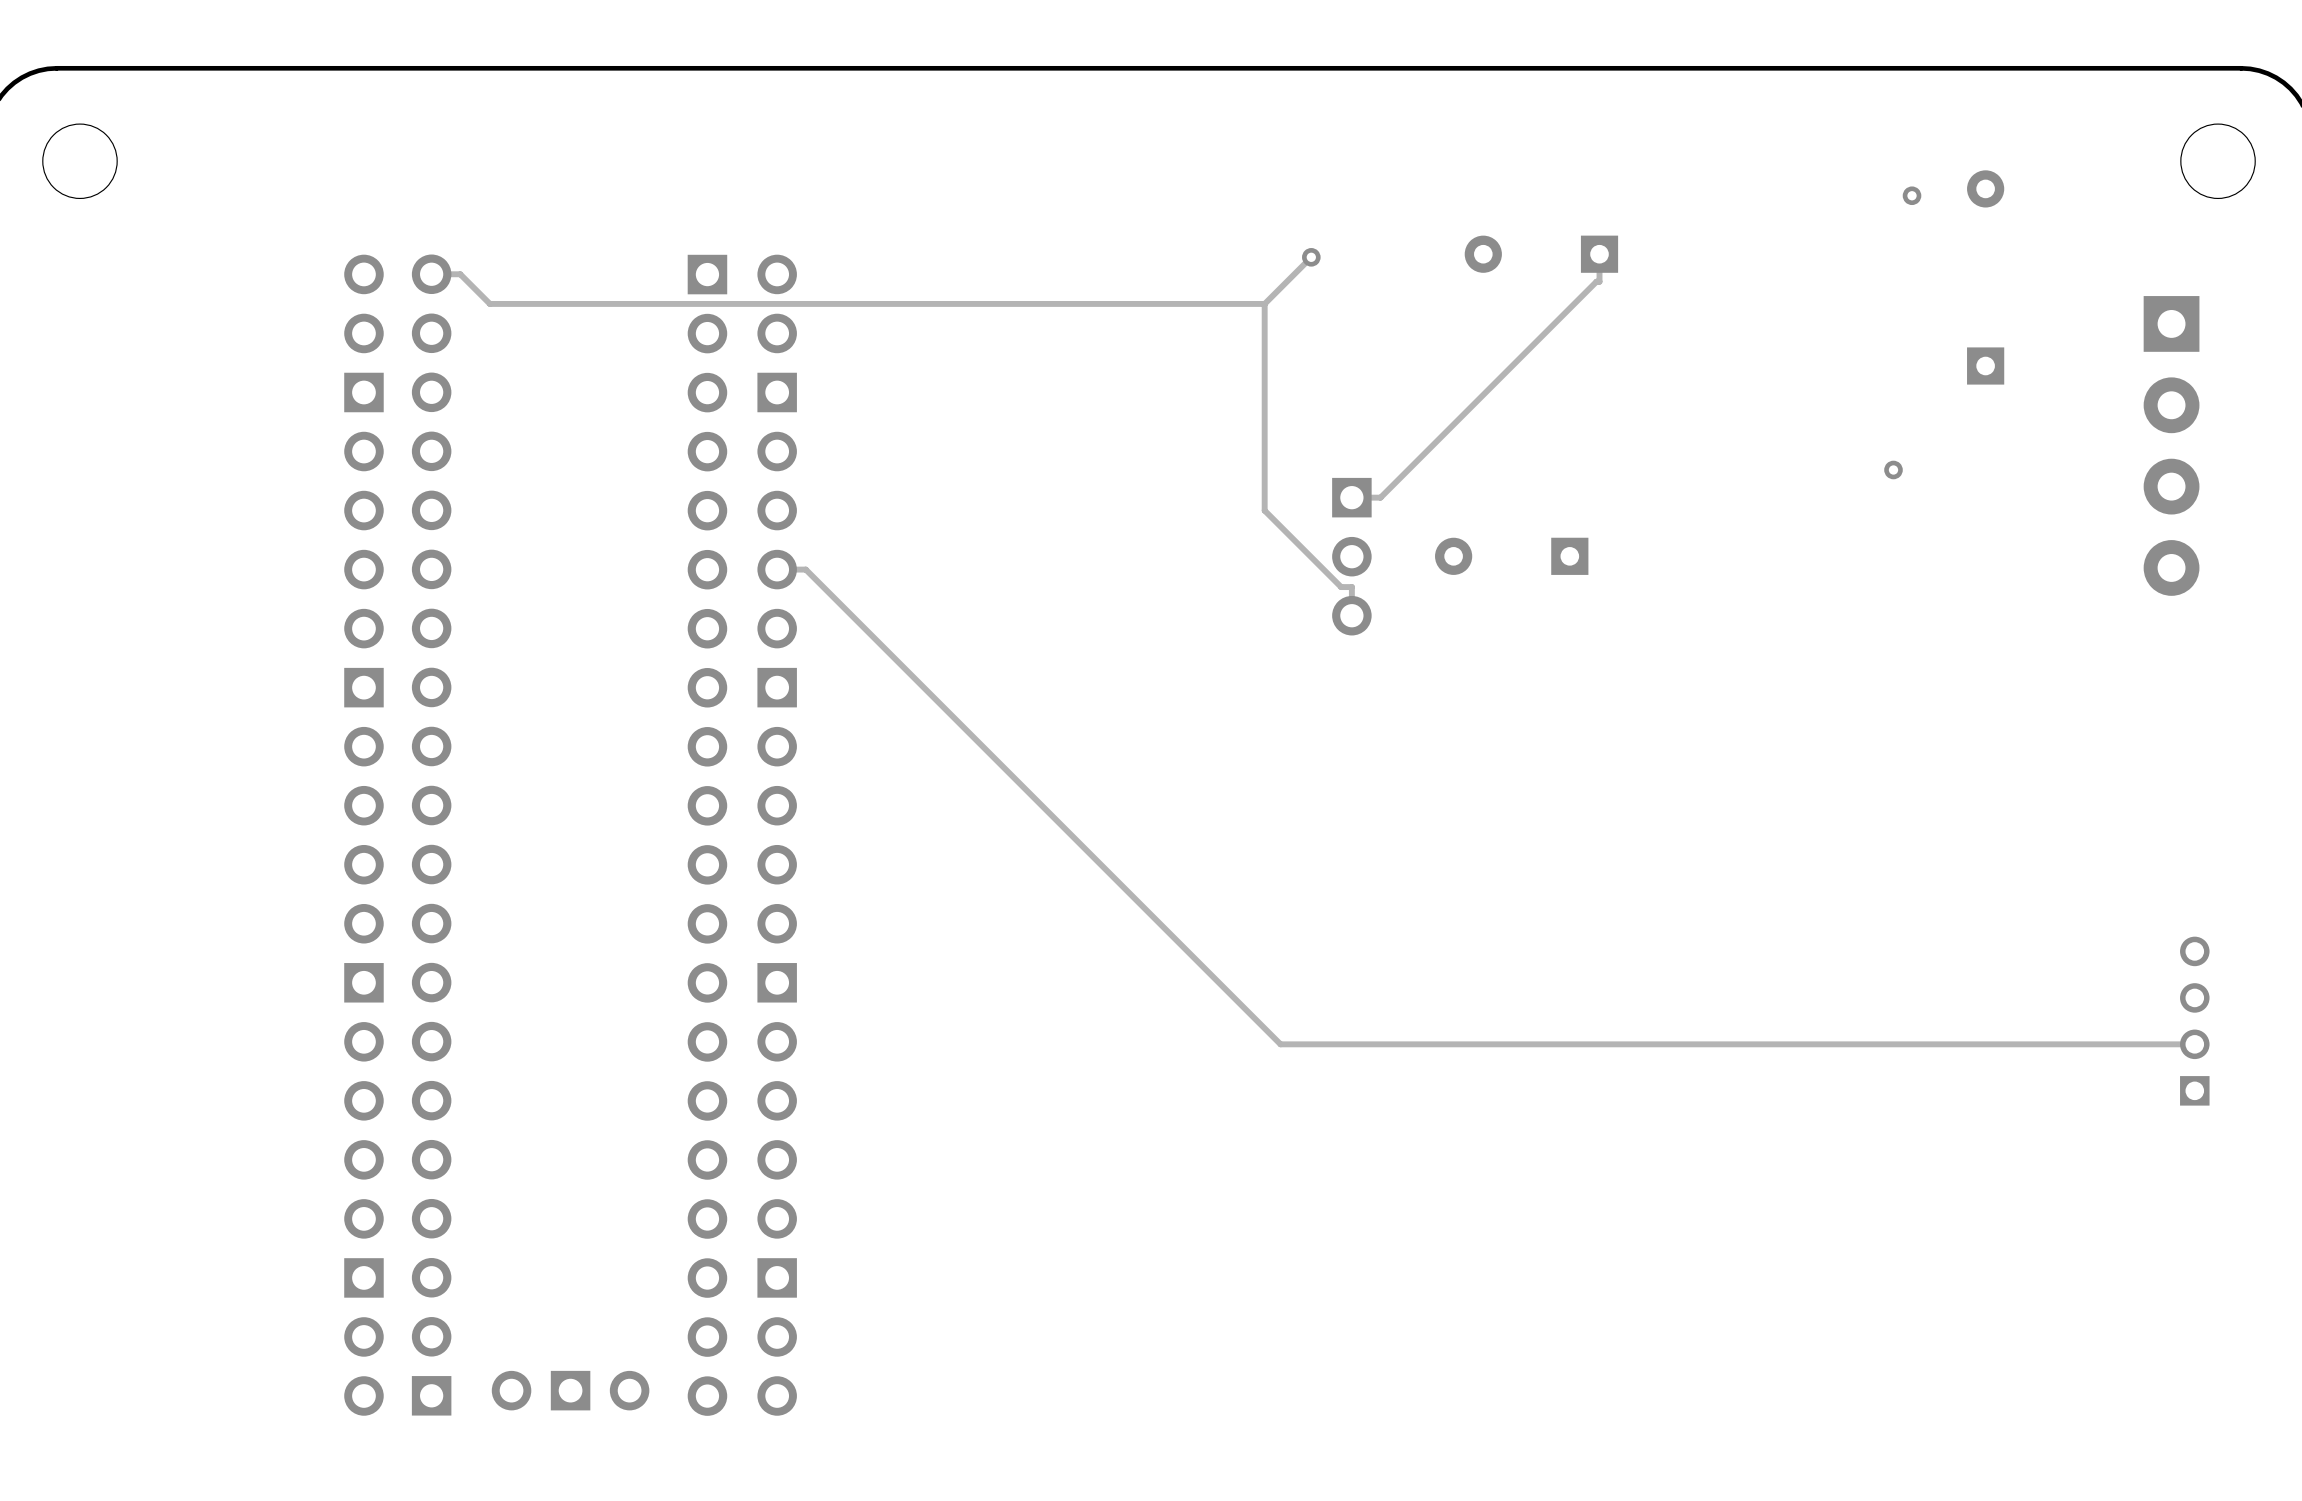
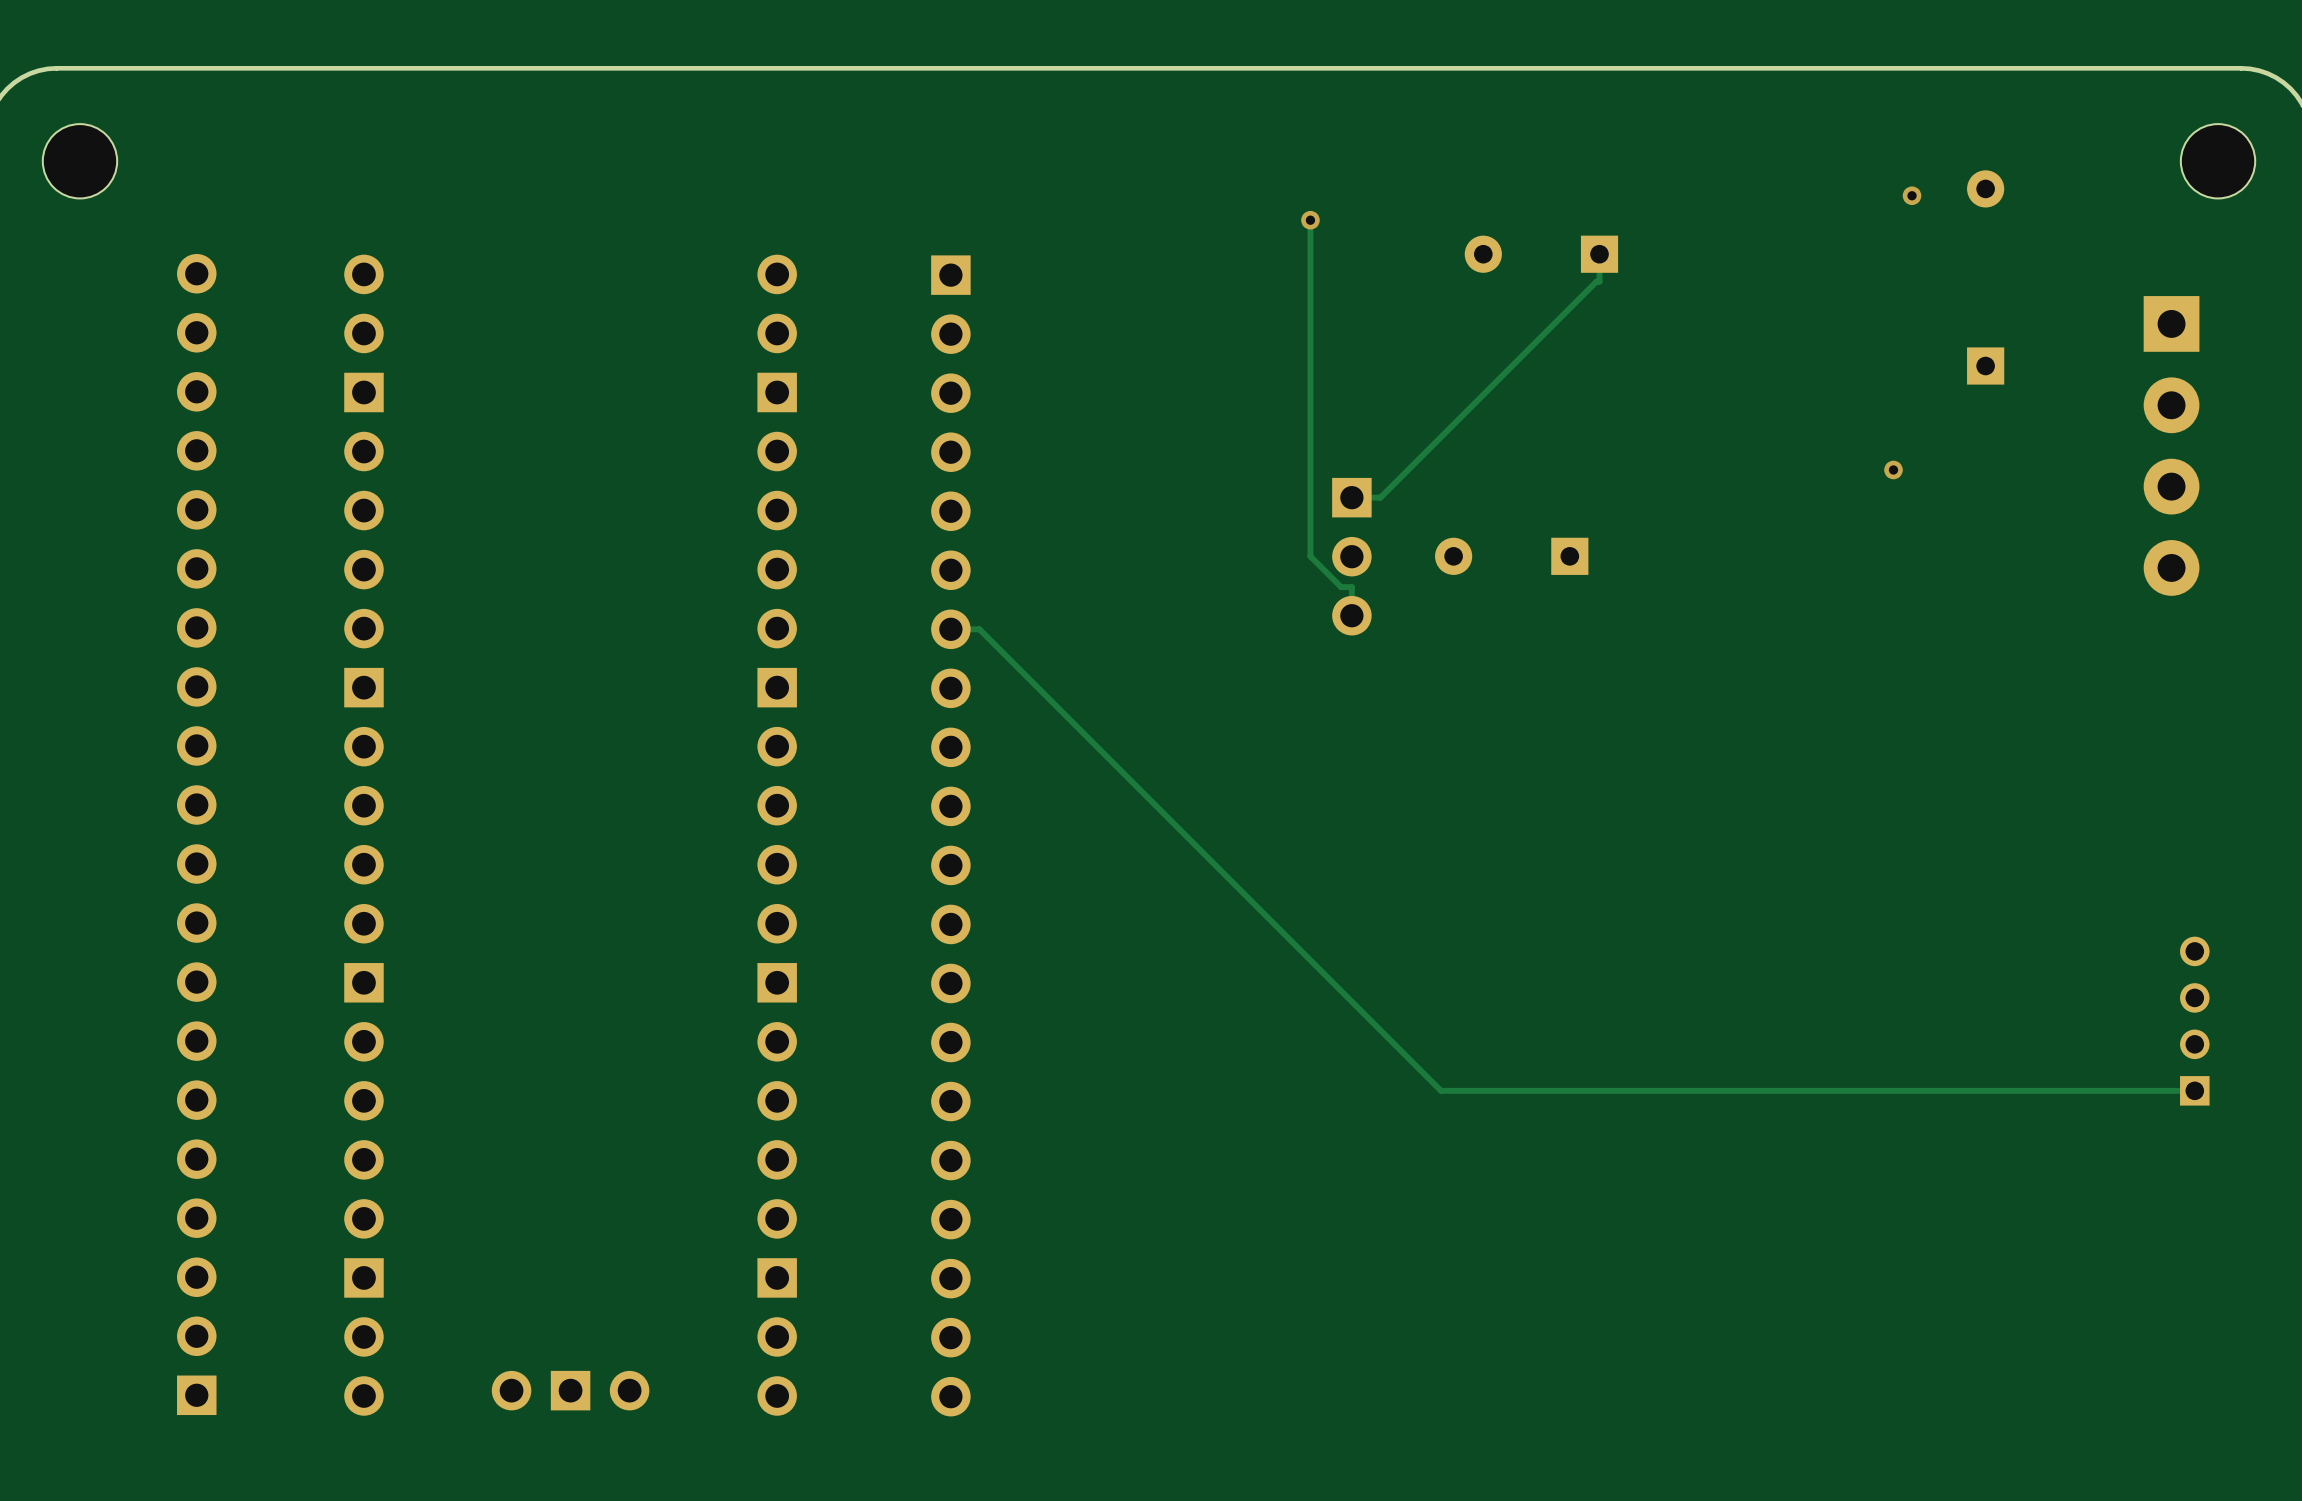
track: (1311, 257) (1264, 303) -> none
via position: (1311, 257) -> (1310, 220)
track: (431, 274) (460, 274) (489, 303) (1264, 303) -> none
track: (1264, 303) (1264, 510) (1310, 556) -> (1310, 220) (1310, 556)
track: (777, 569) (805, 569) (1280, 1044) (2194, 1044) -> none
track: none -> (950, 629) (979, 629) (1441, 1090) (2194, 1090)
part position: (431, 835) -> (196, 834)
part position: (707, 835) -> (950, 835)

